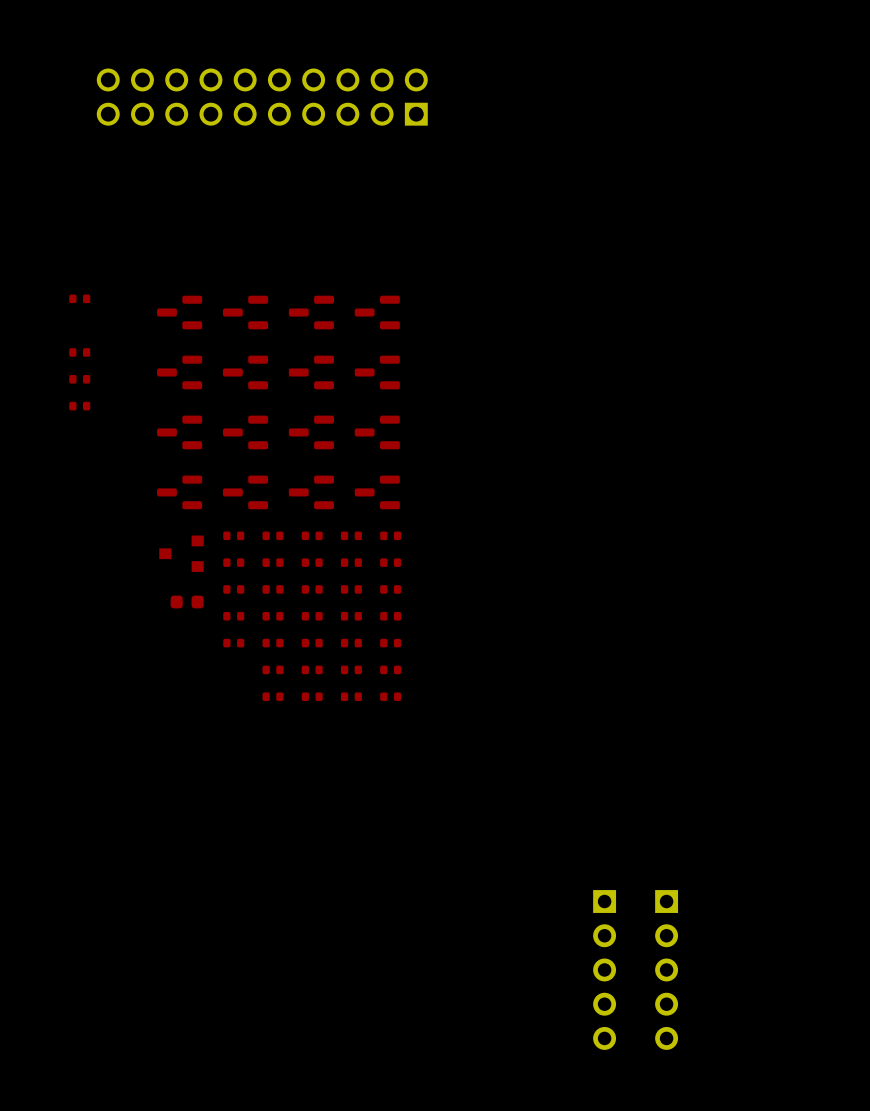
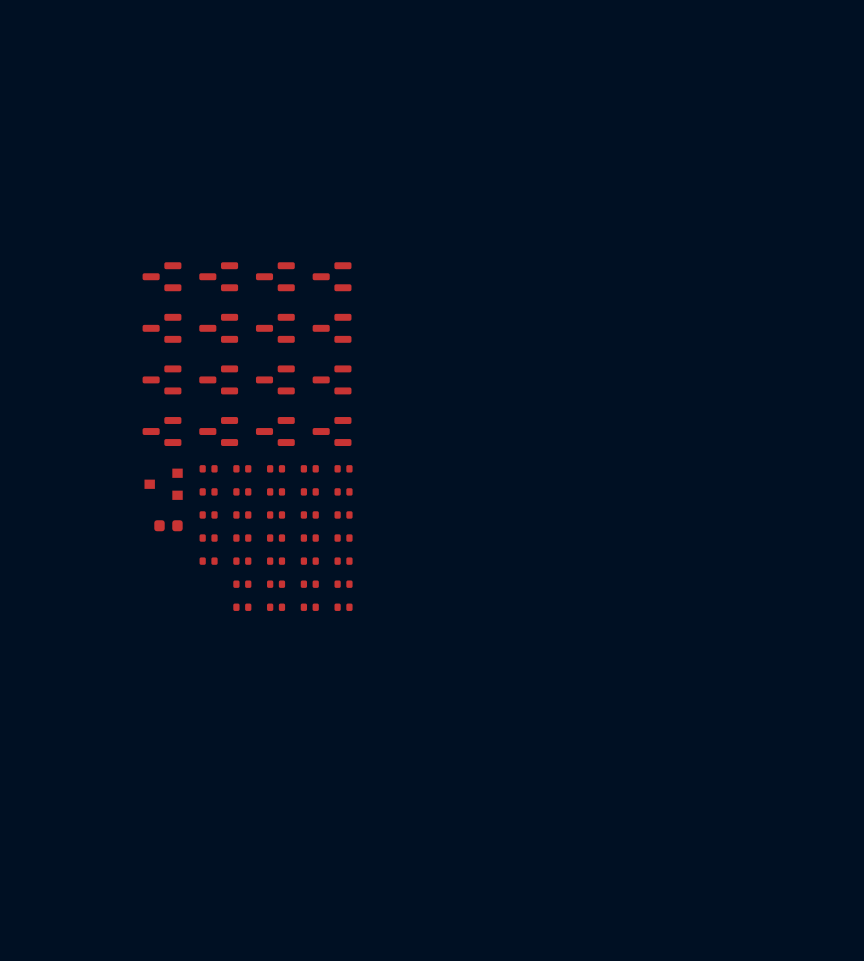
part: (262, 97) -> none
part: (79, 298) -> none
part: (79, 352) -> none
part: (79, 379) -> none
part: (79, 406) -> none
part: (604, 969) -> none
part: (666, 969) -> none

